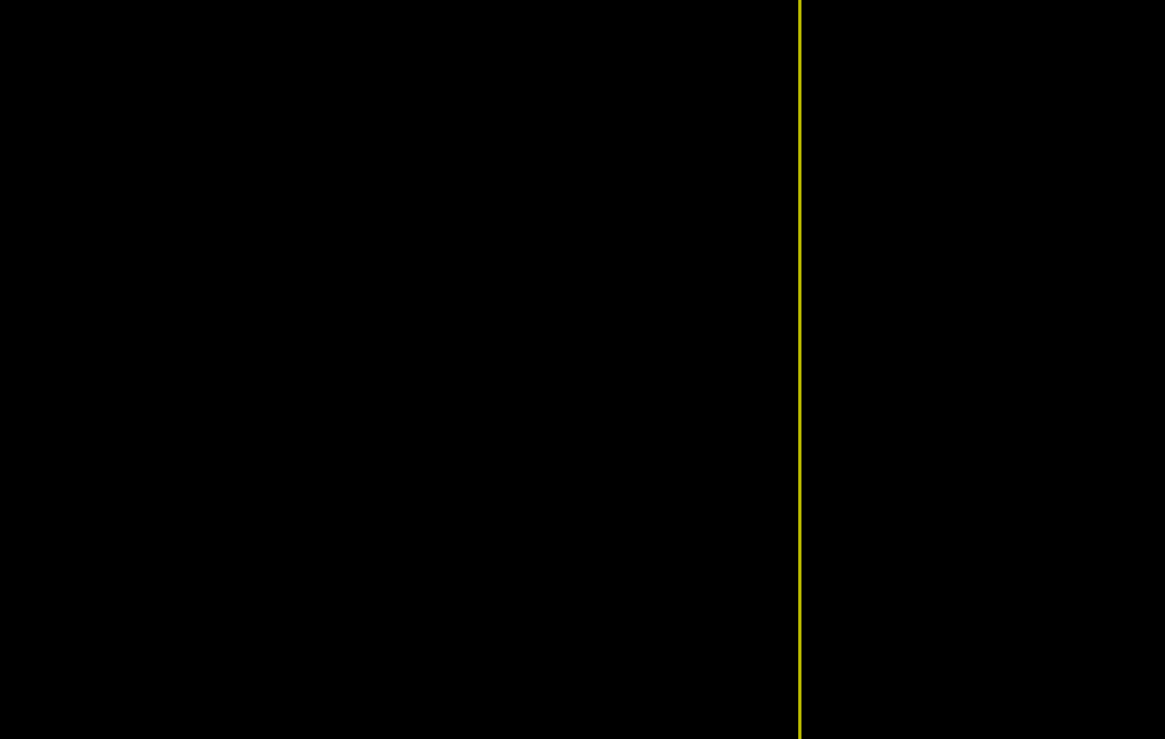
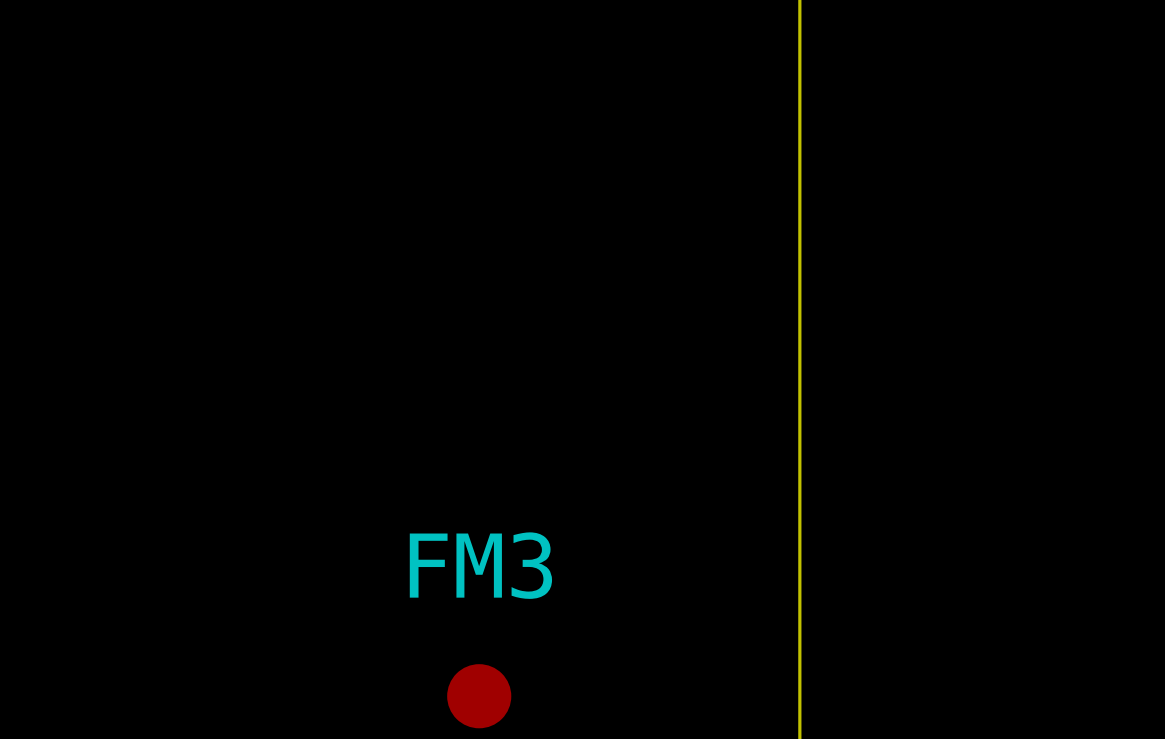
FM3: none -> (479, 696)

